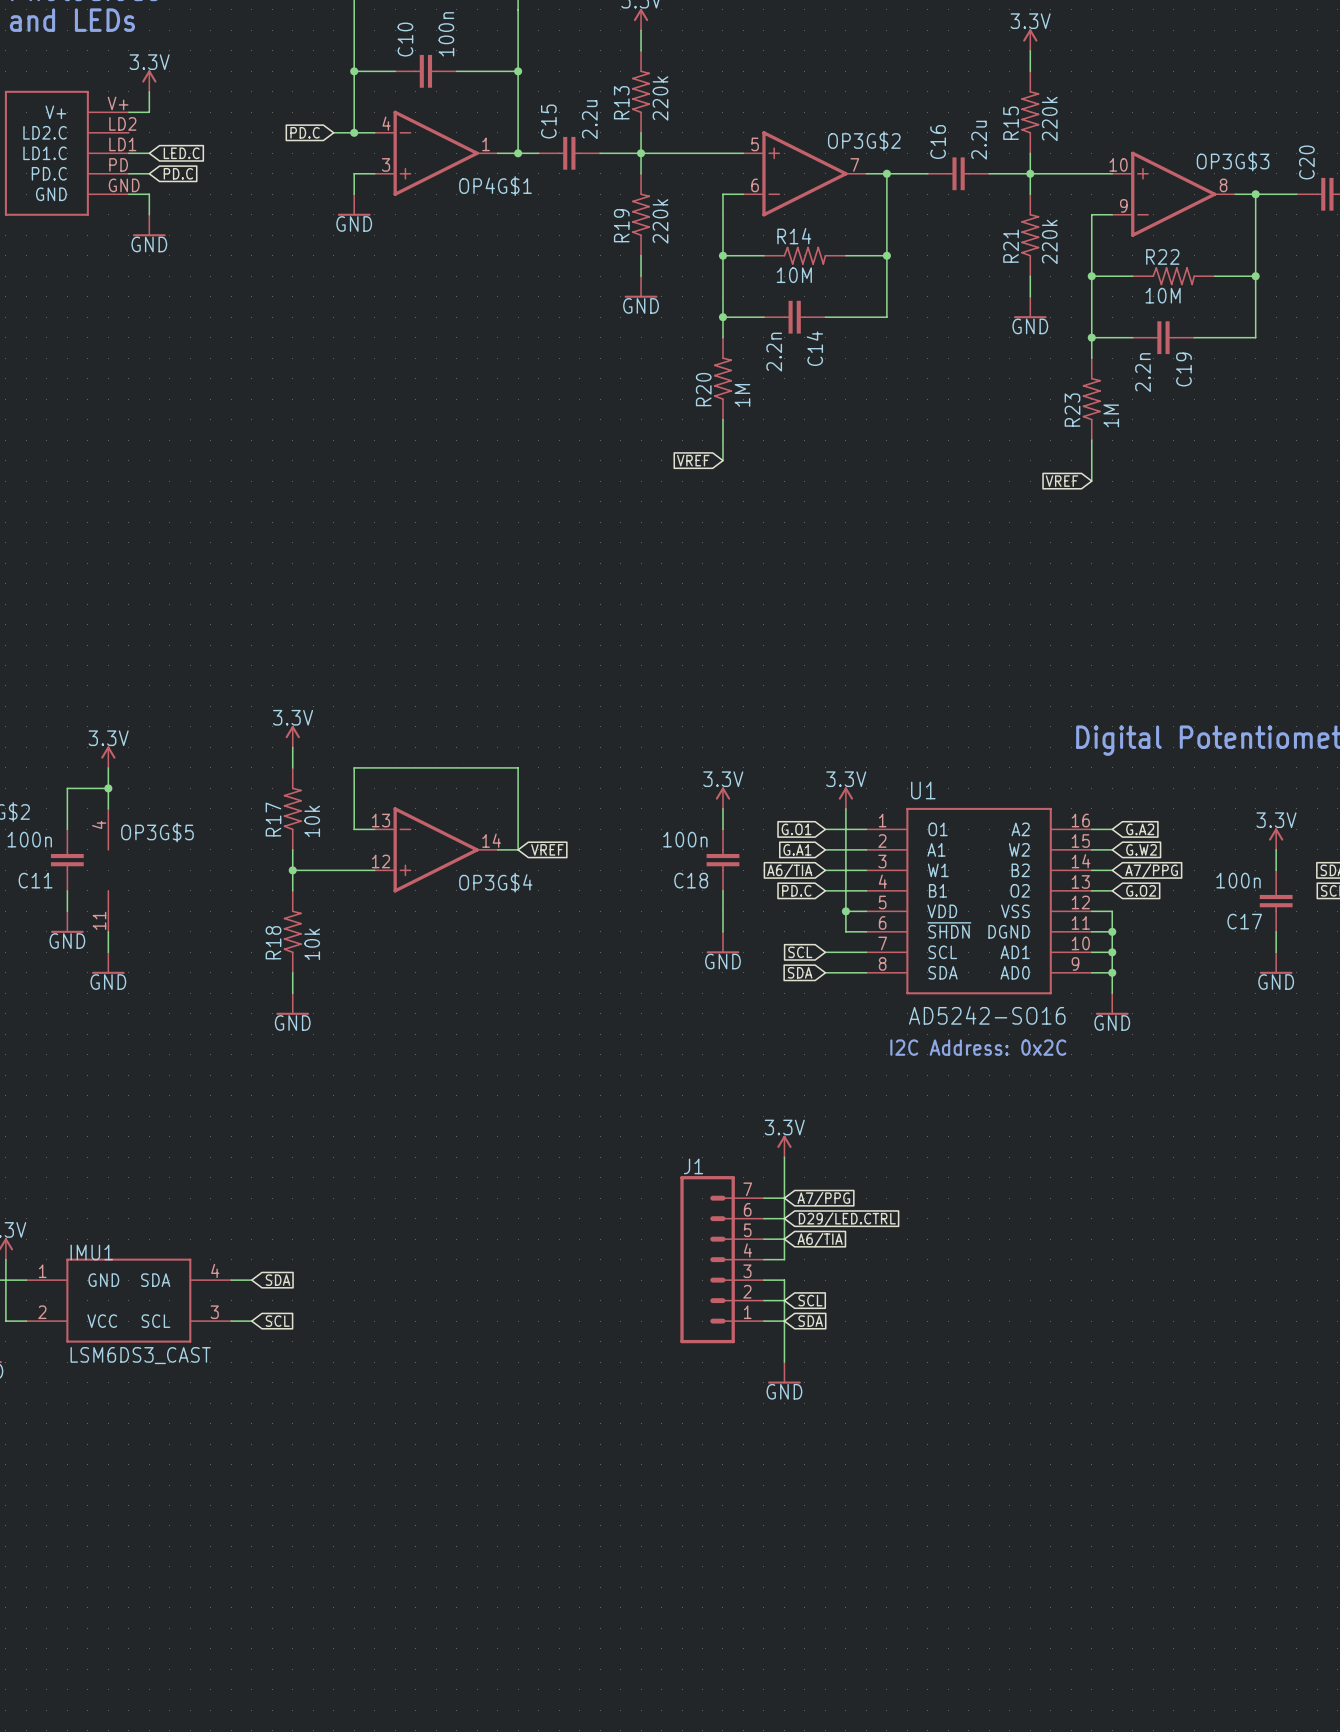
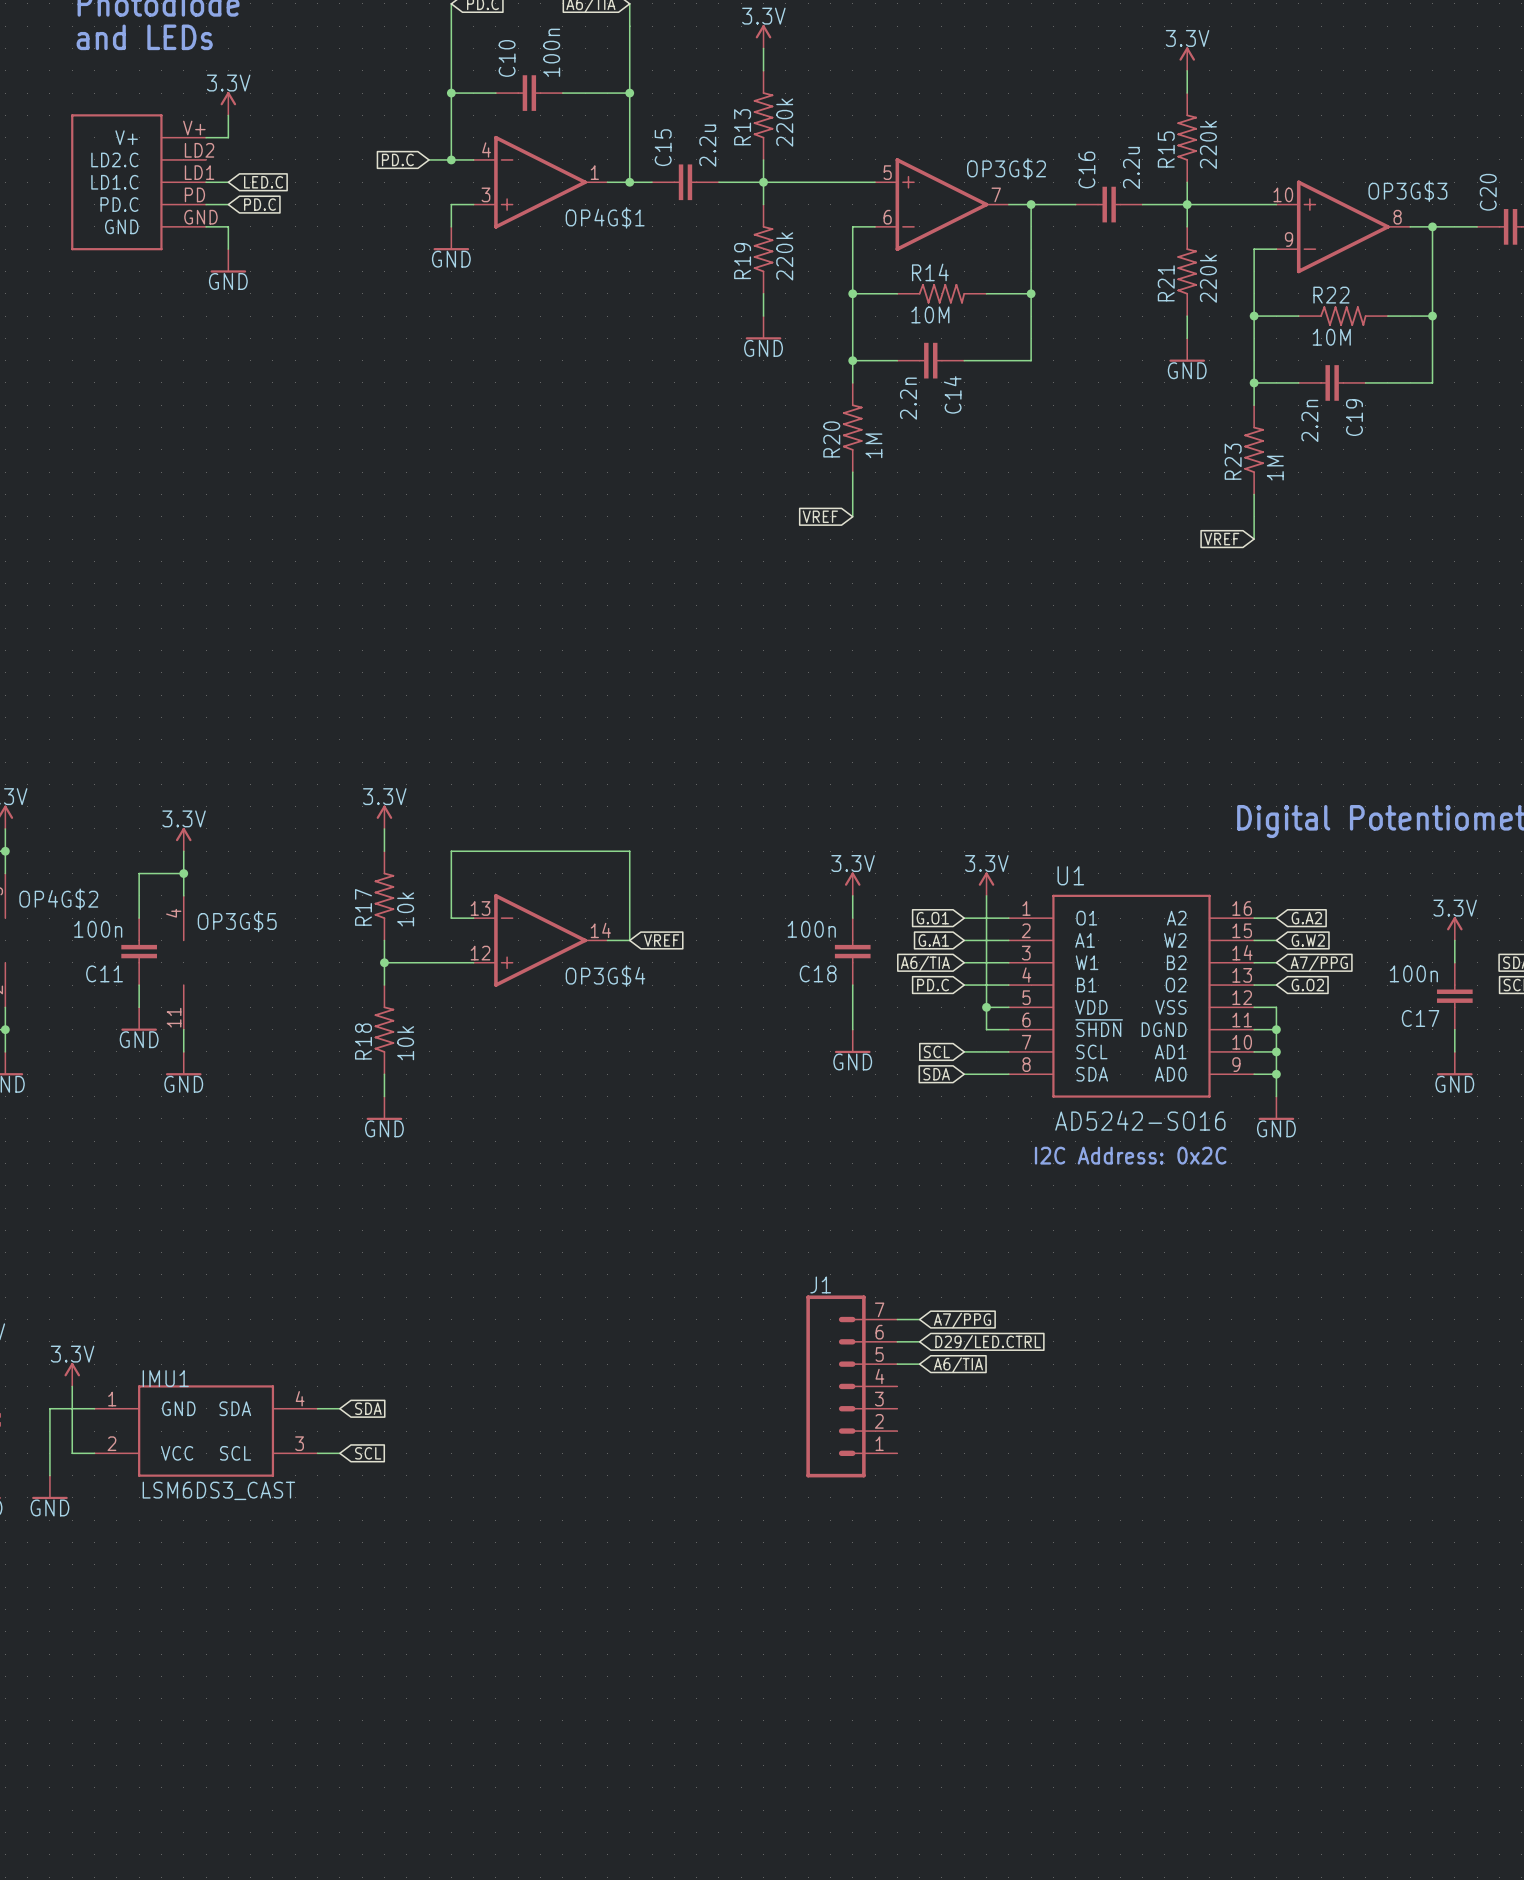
power symbol: 3.3V (784, 1146) -> none
wire: (784, 1157) (784, 1259) (763, 1259) -> none
wire: (763, 1280) (784, 1280) (784, 1362) -> none
wire: (763, 1300) (784, 1300) -> none
global label: SCL (810, 1300) -> none
wire: (763, 1321) (784, 1321) -> none
global label: SDA (810, 1321) -> none
power symbol: GND (784, 1372) -> none

